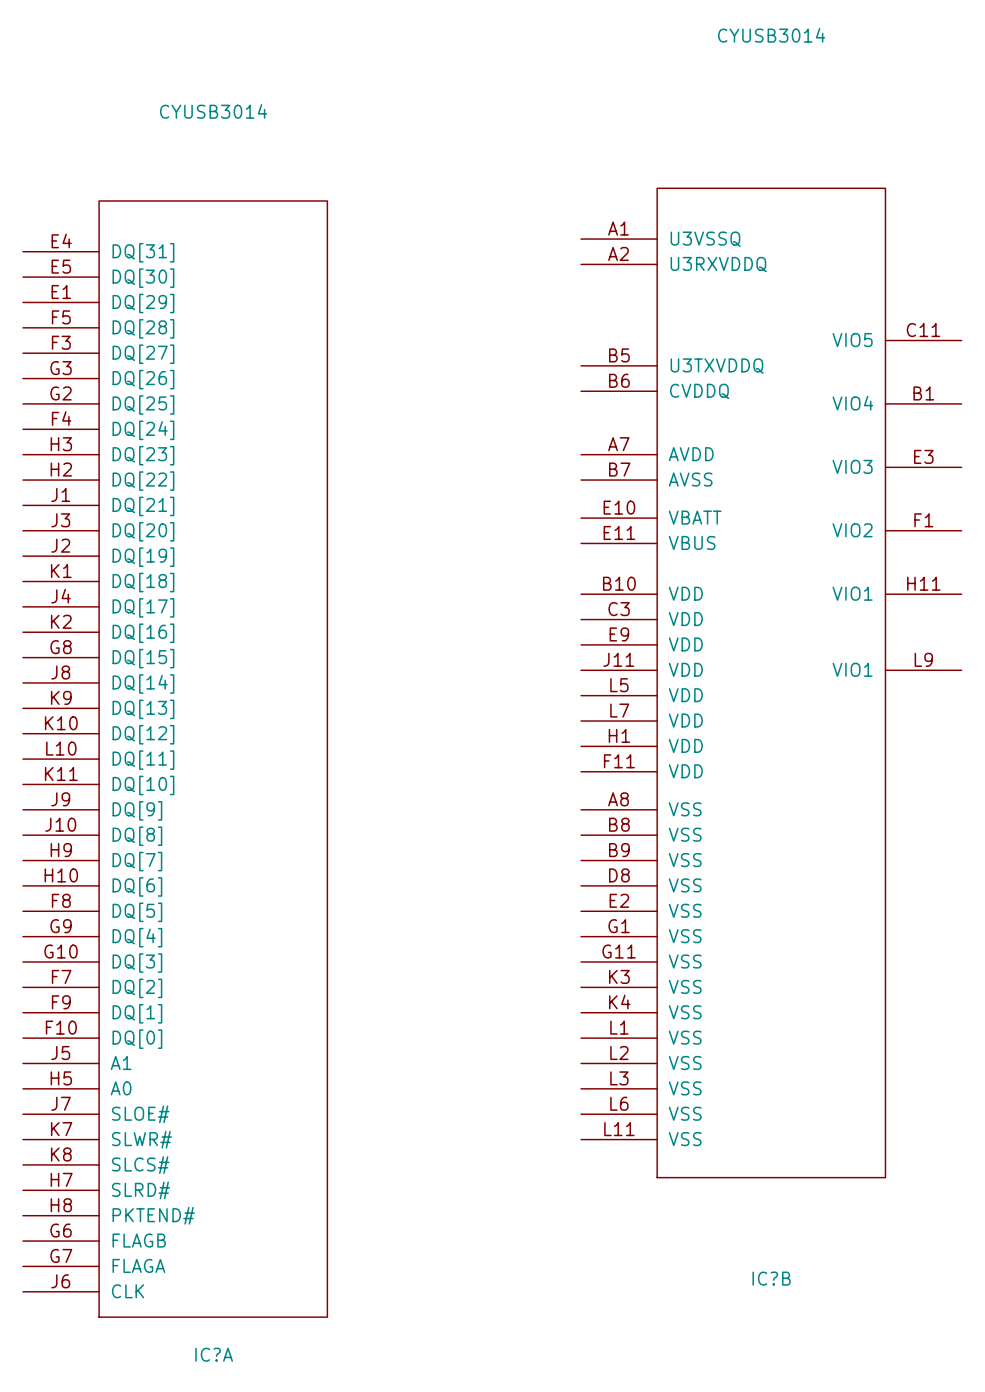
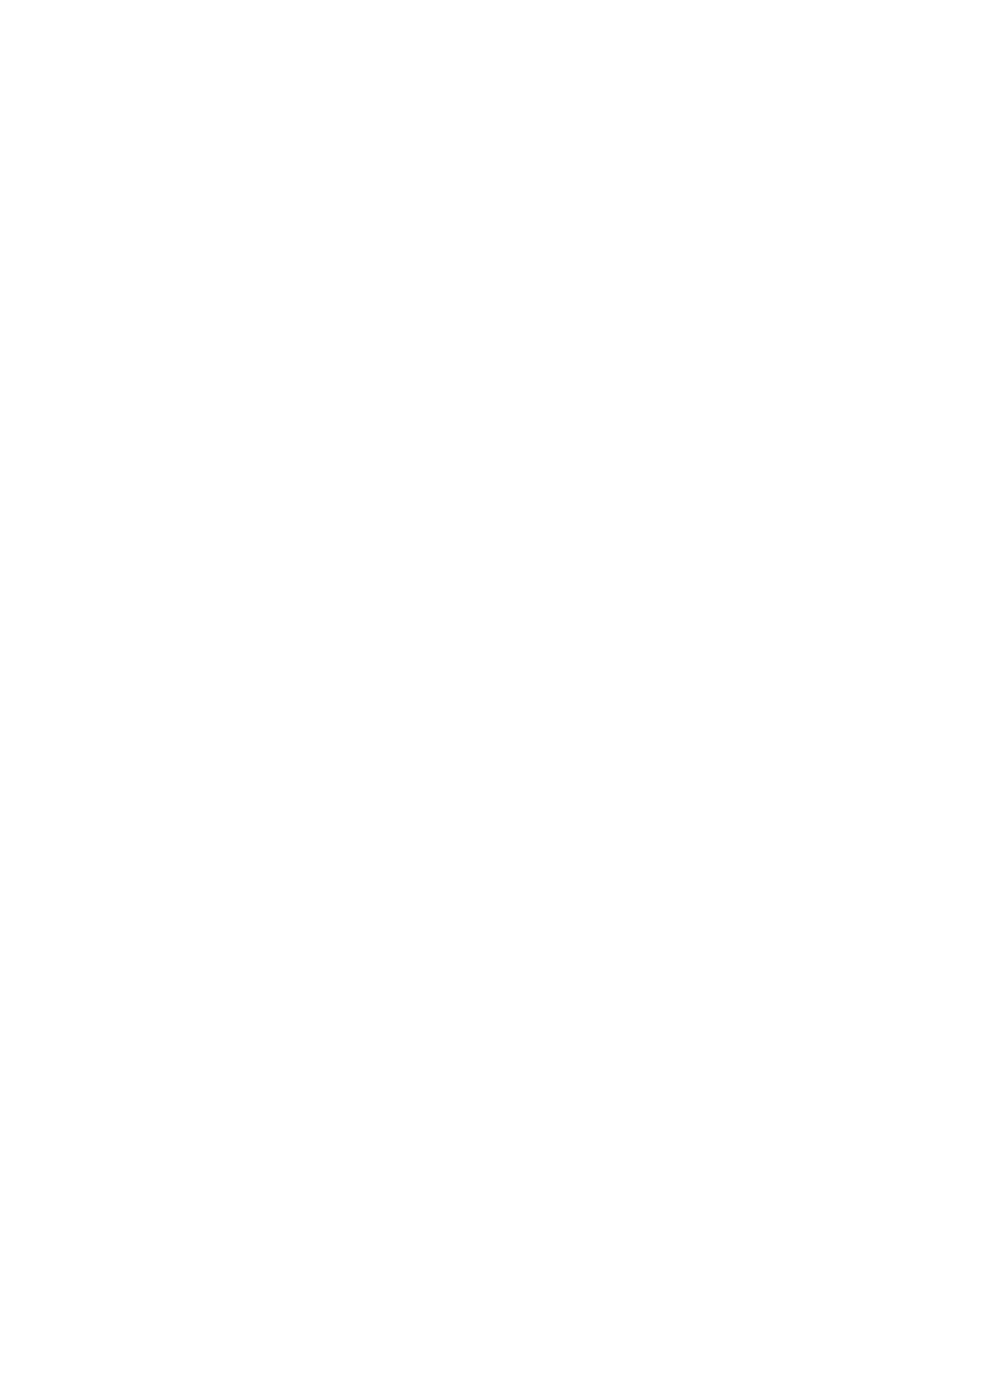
IC?B: CYUSB3014 (771, 682) -> none
IC?A: CYUSB3014 (175, 759) -> none

